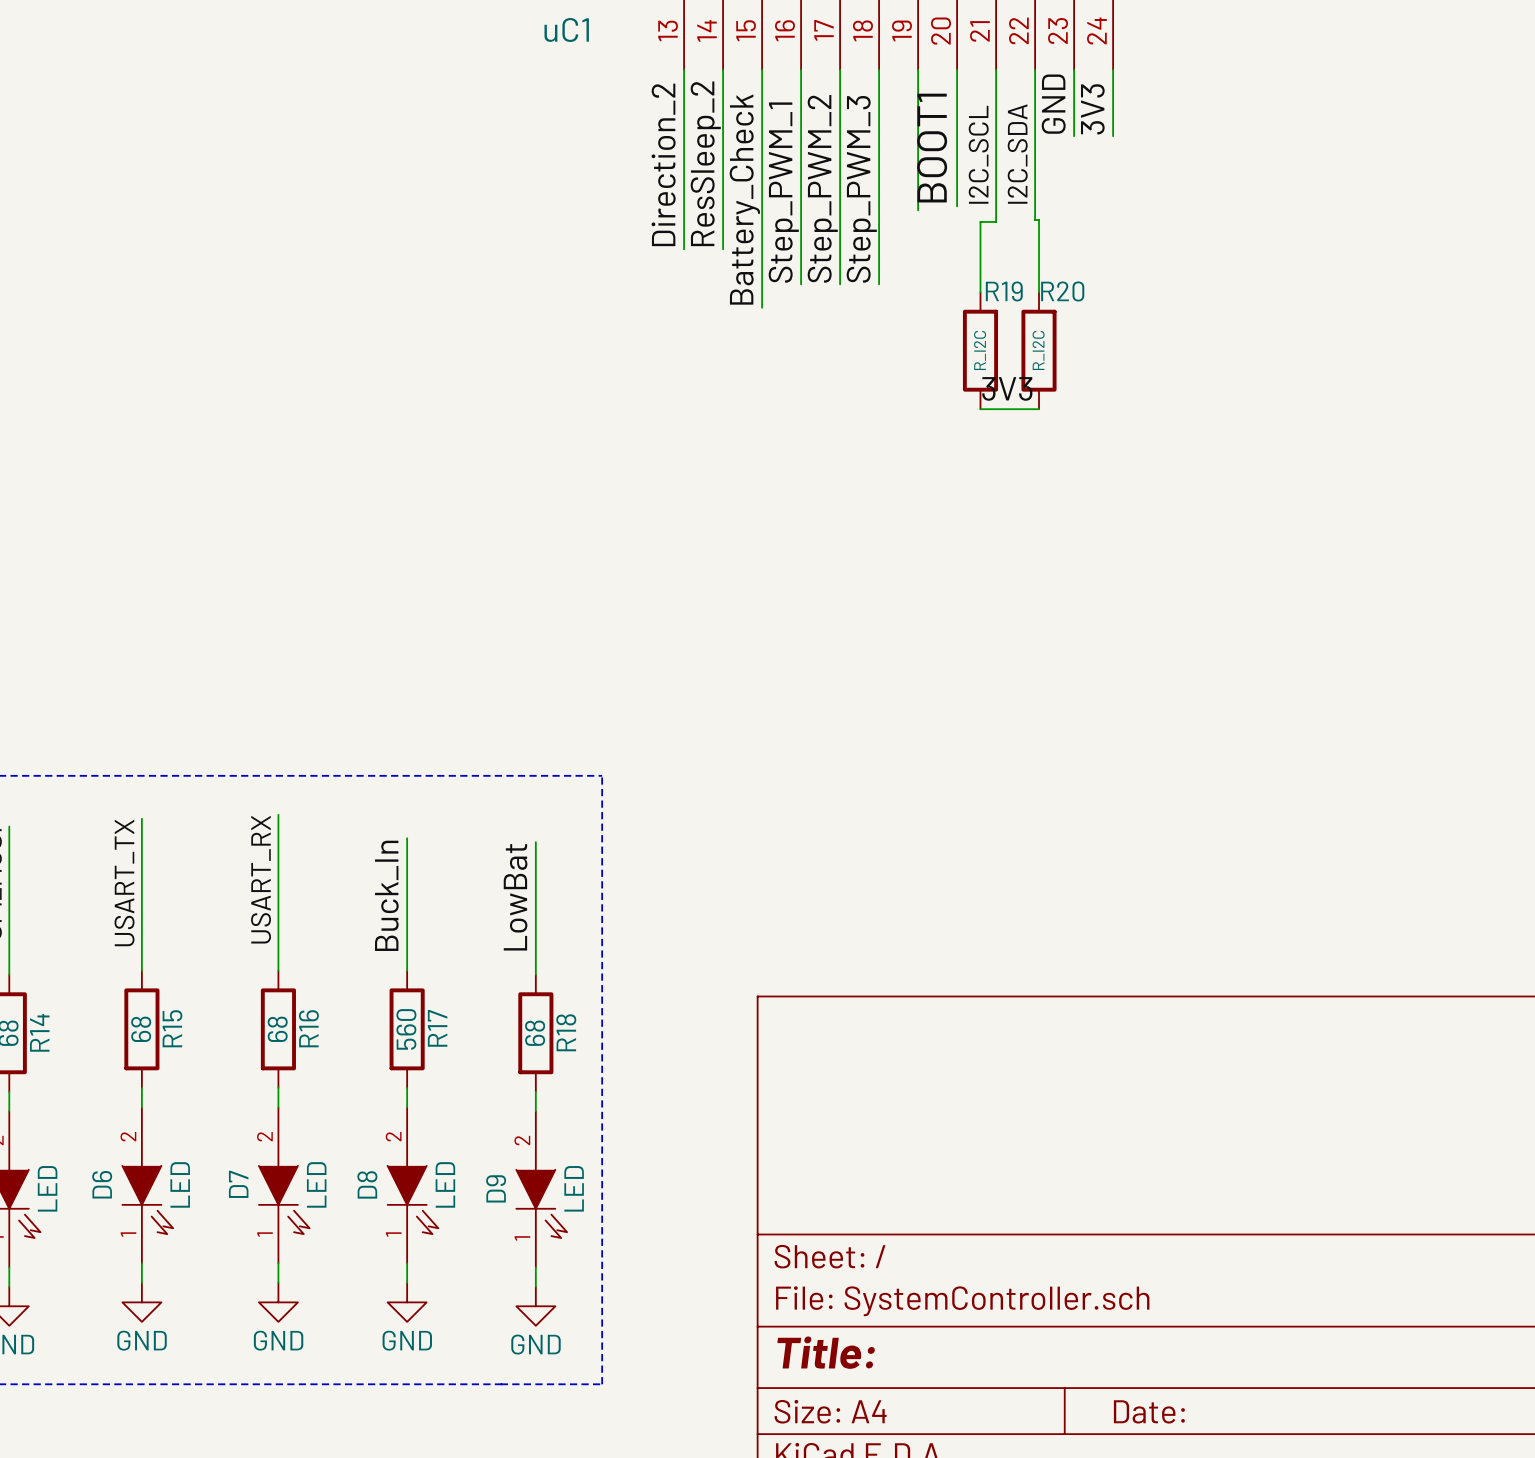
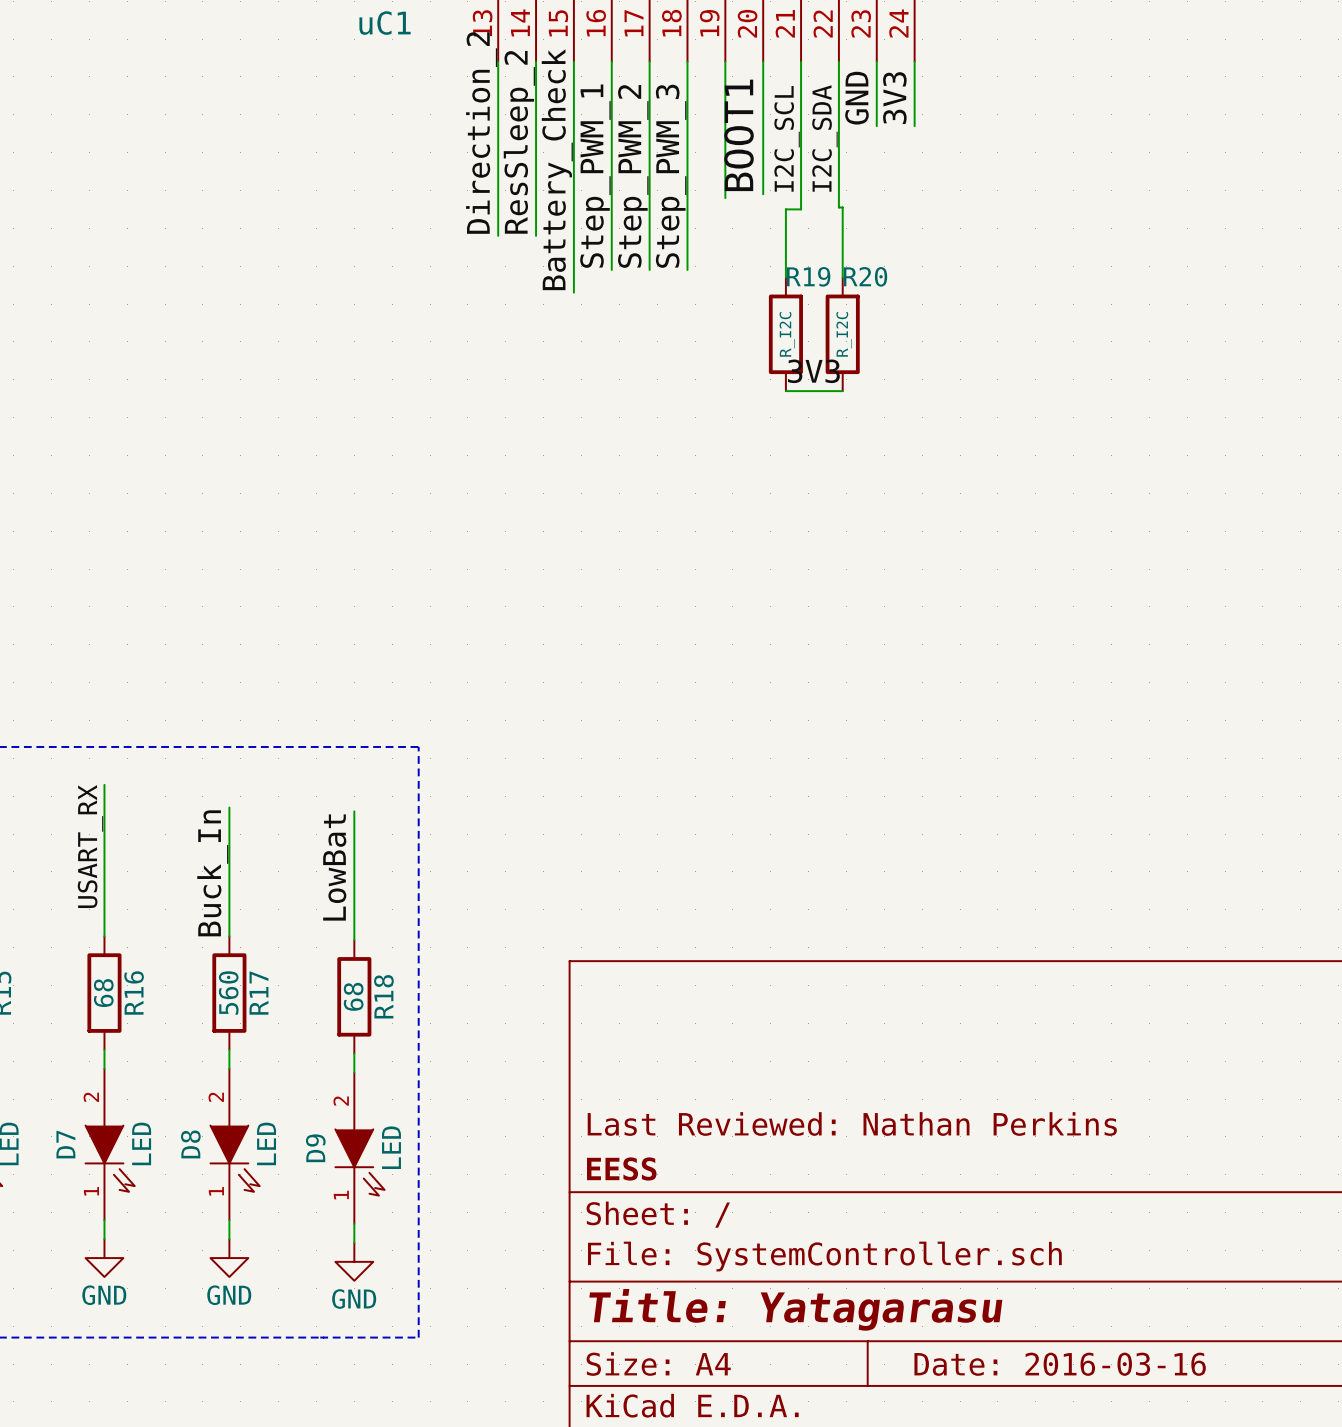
title block: none -> Last Reviewed: Nathan Perkins (852, 1124)
title block: none -> EESS (621, 1168)
title block: Title: (826, 1352) -> Title: Yatagarasu (795, 1309)
title block: Date: (1149, 1411) -> Date: 2016-03-16 (1060, 1364)

